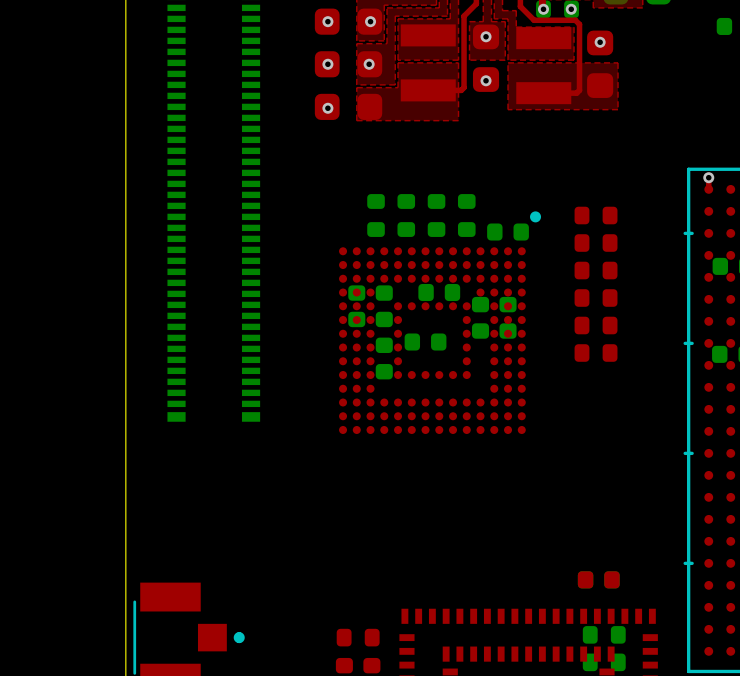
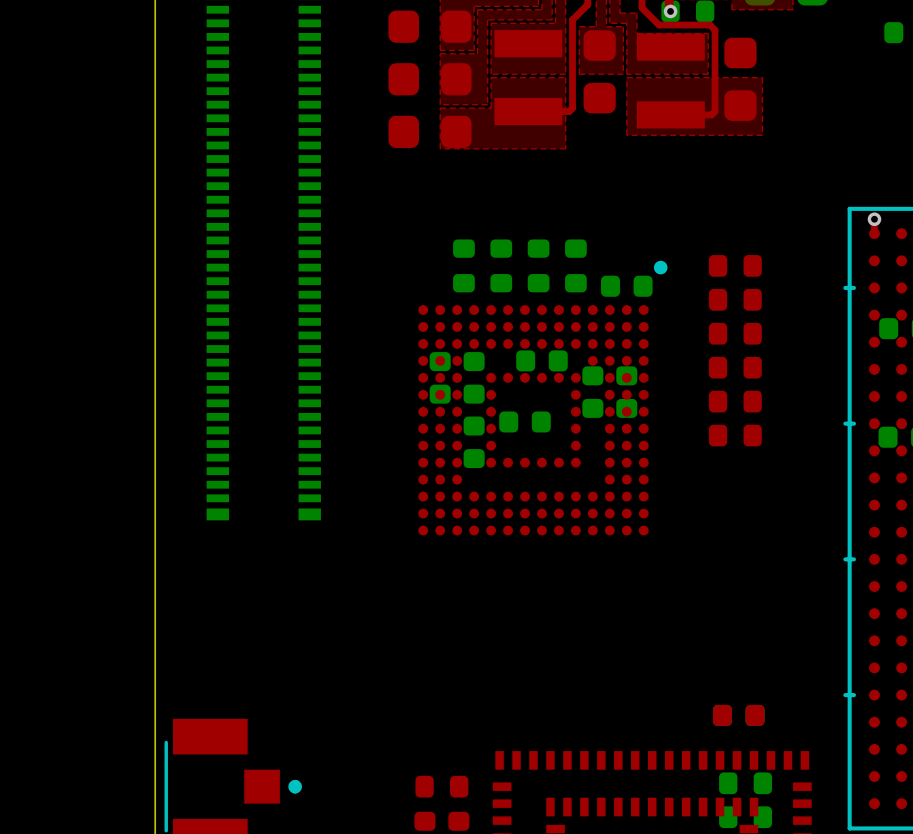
via: (571, 9) -> none
via: (327, 21) -> none
via: (370, 21) -> none
via: (486, 36) -> none
via: (600, 42) -> none
via: (327, 64) -> none
via: (369, 64) -> none
via: (486, 80) -> none
via: (327, 108) -> none

